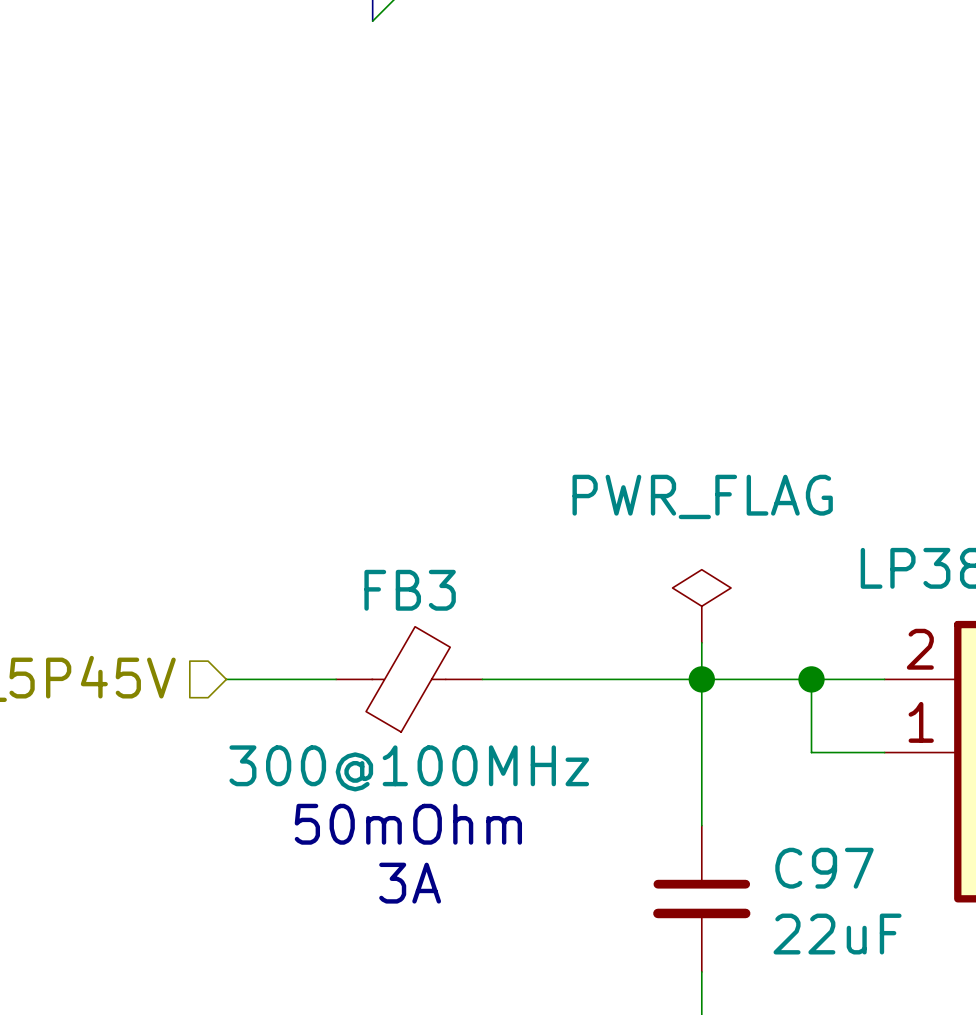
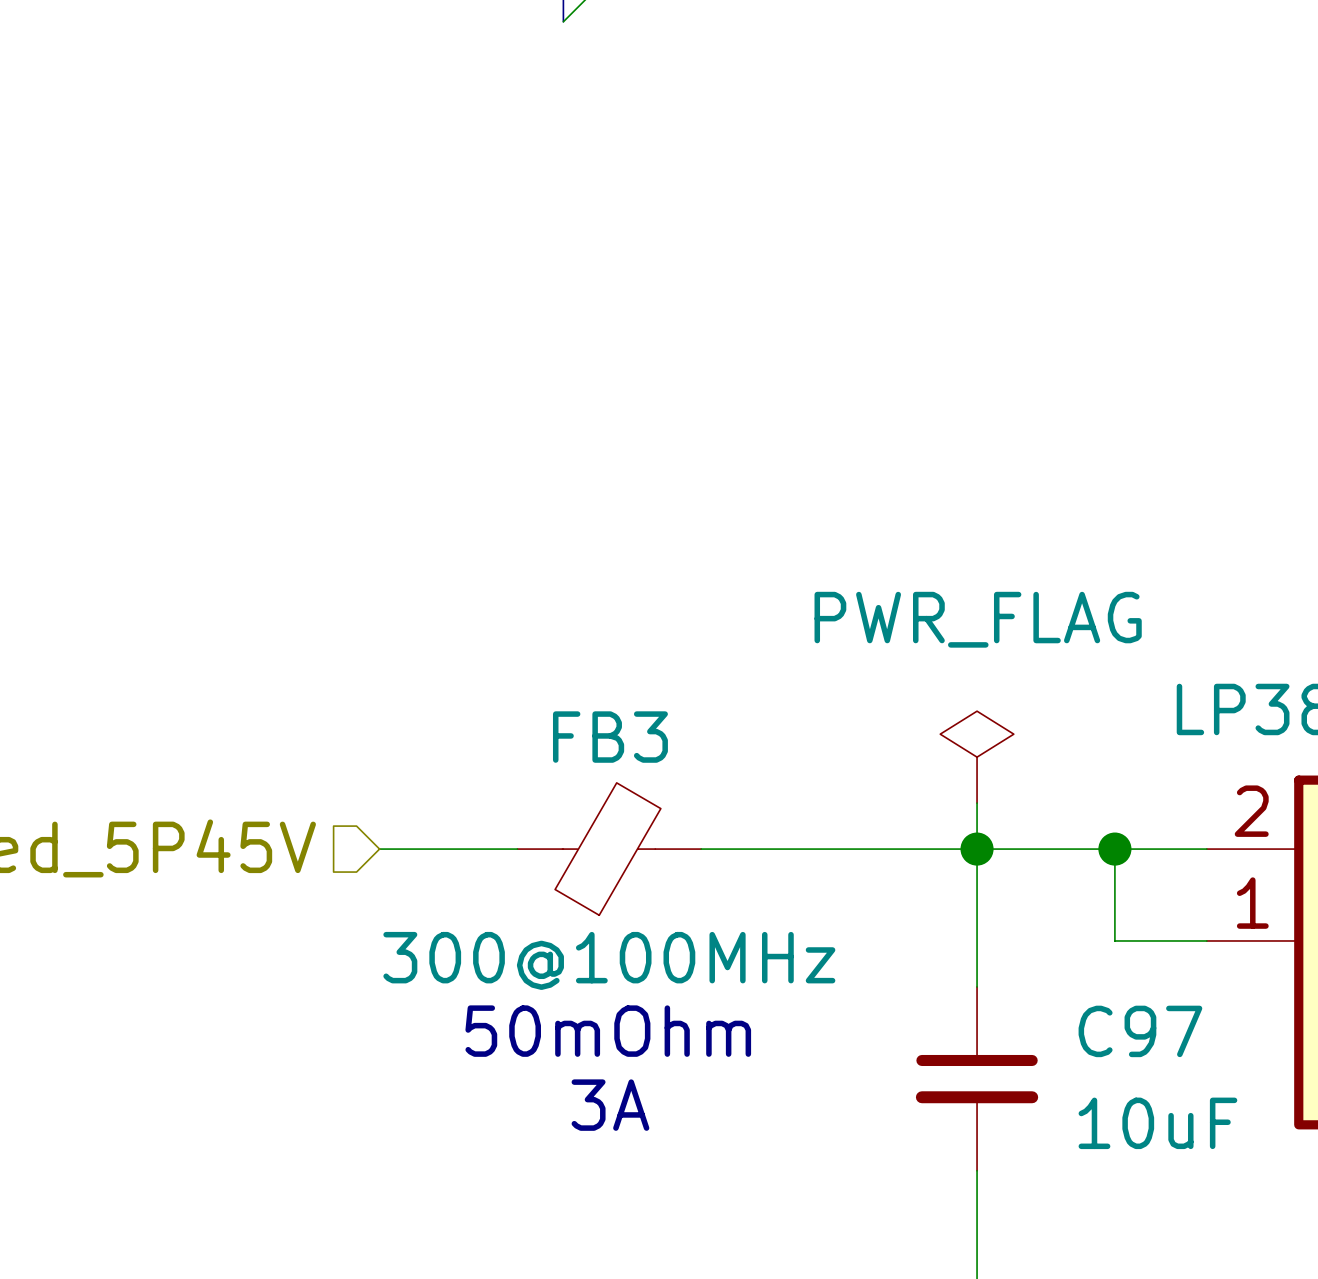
C97 name position: C97 (824, 868) -> C97 (1140, 1031)
C97 position: (701, 898) -> (977, 1078)
C97 value: 22uF (837, 934) -> 10uF (1157, 1123)

